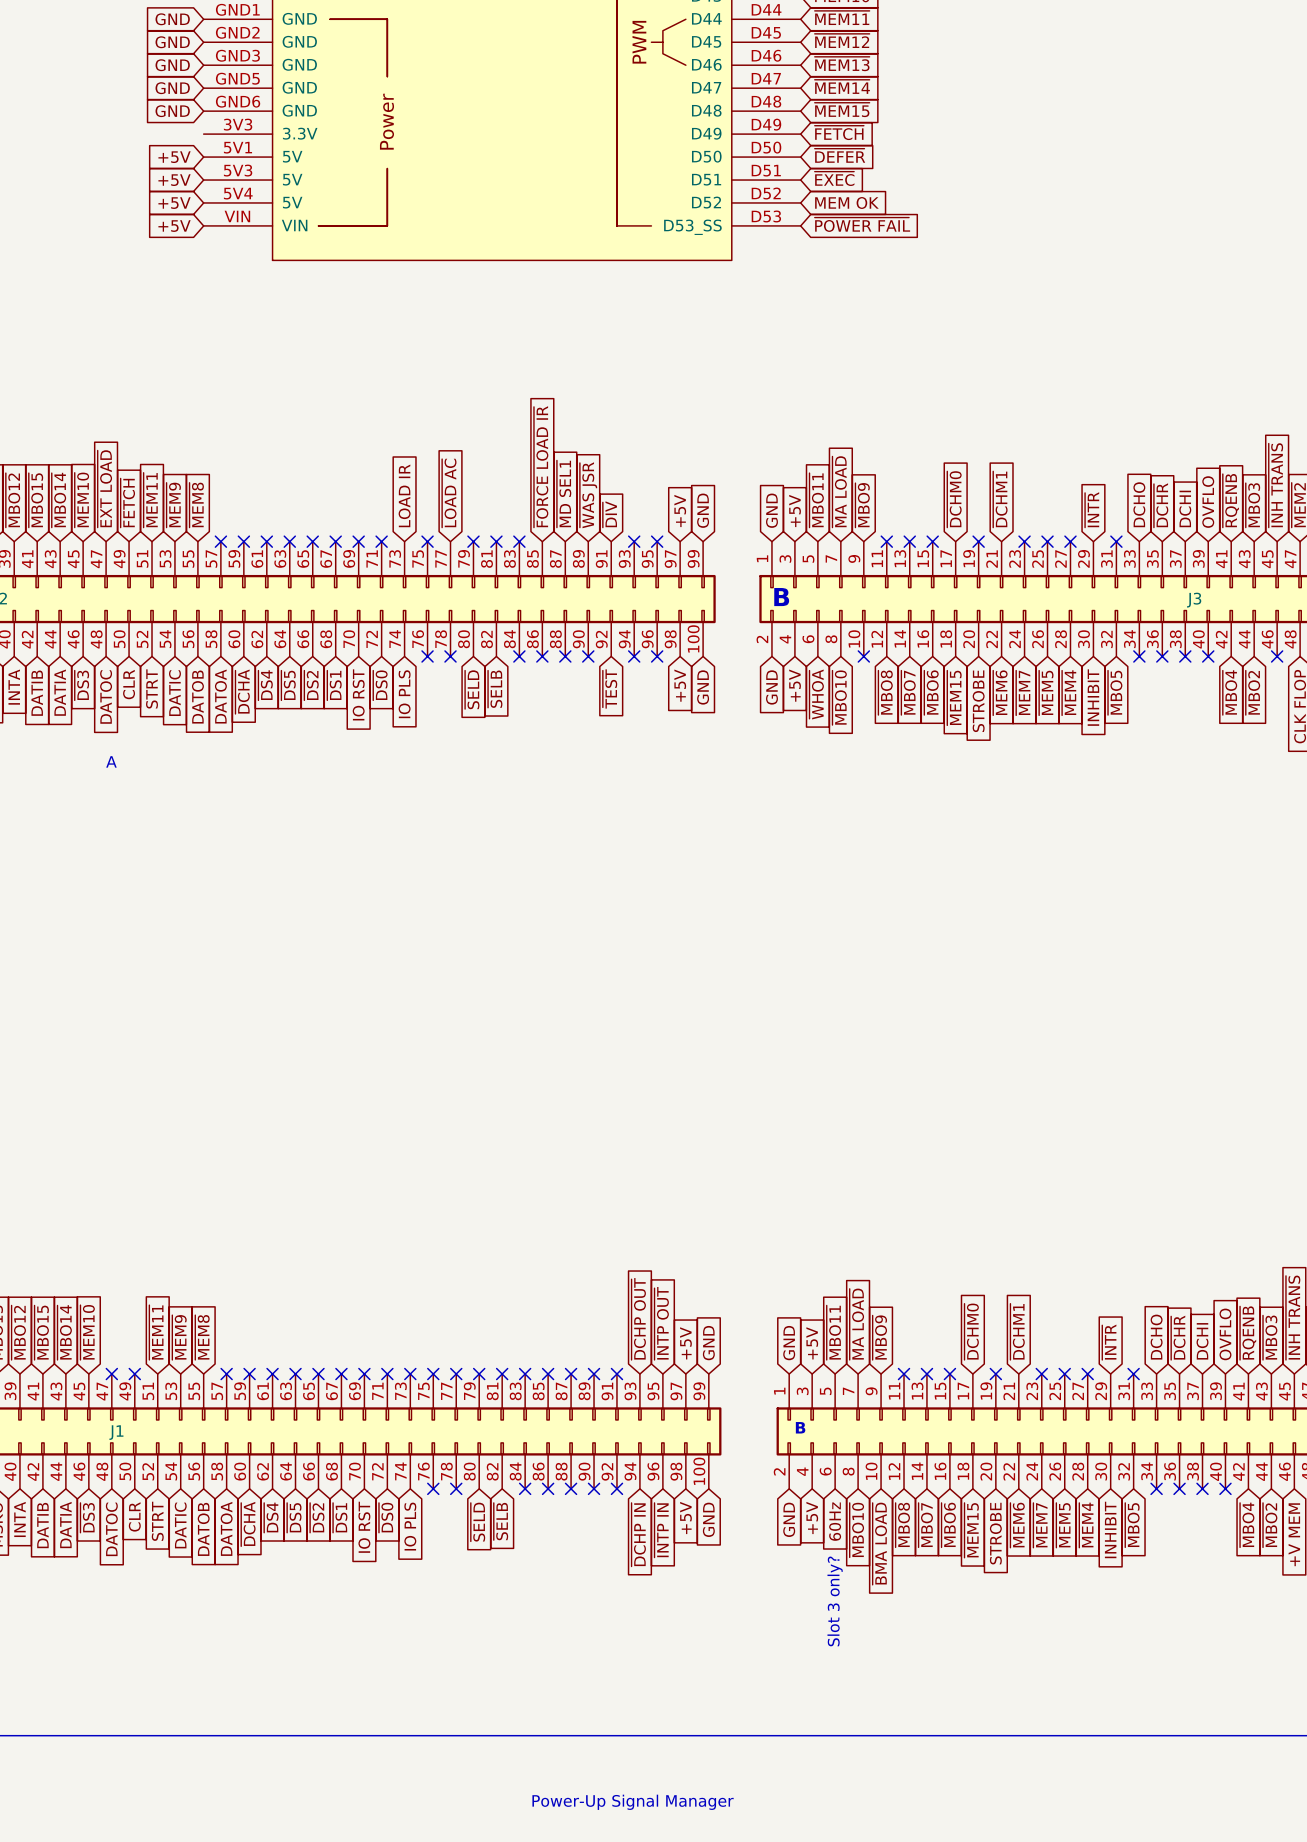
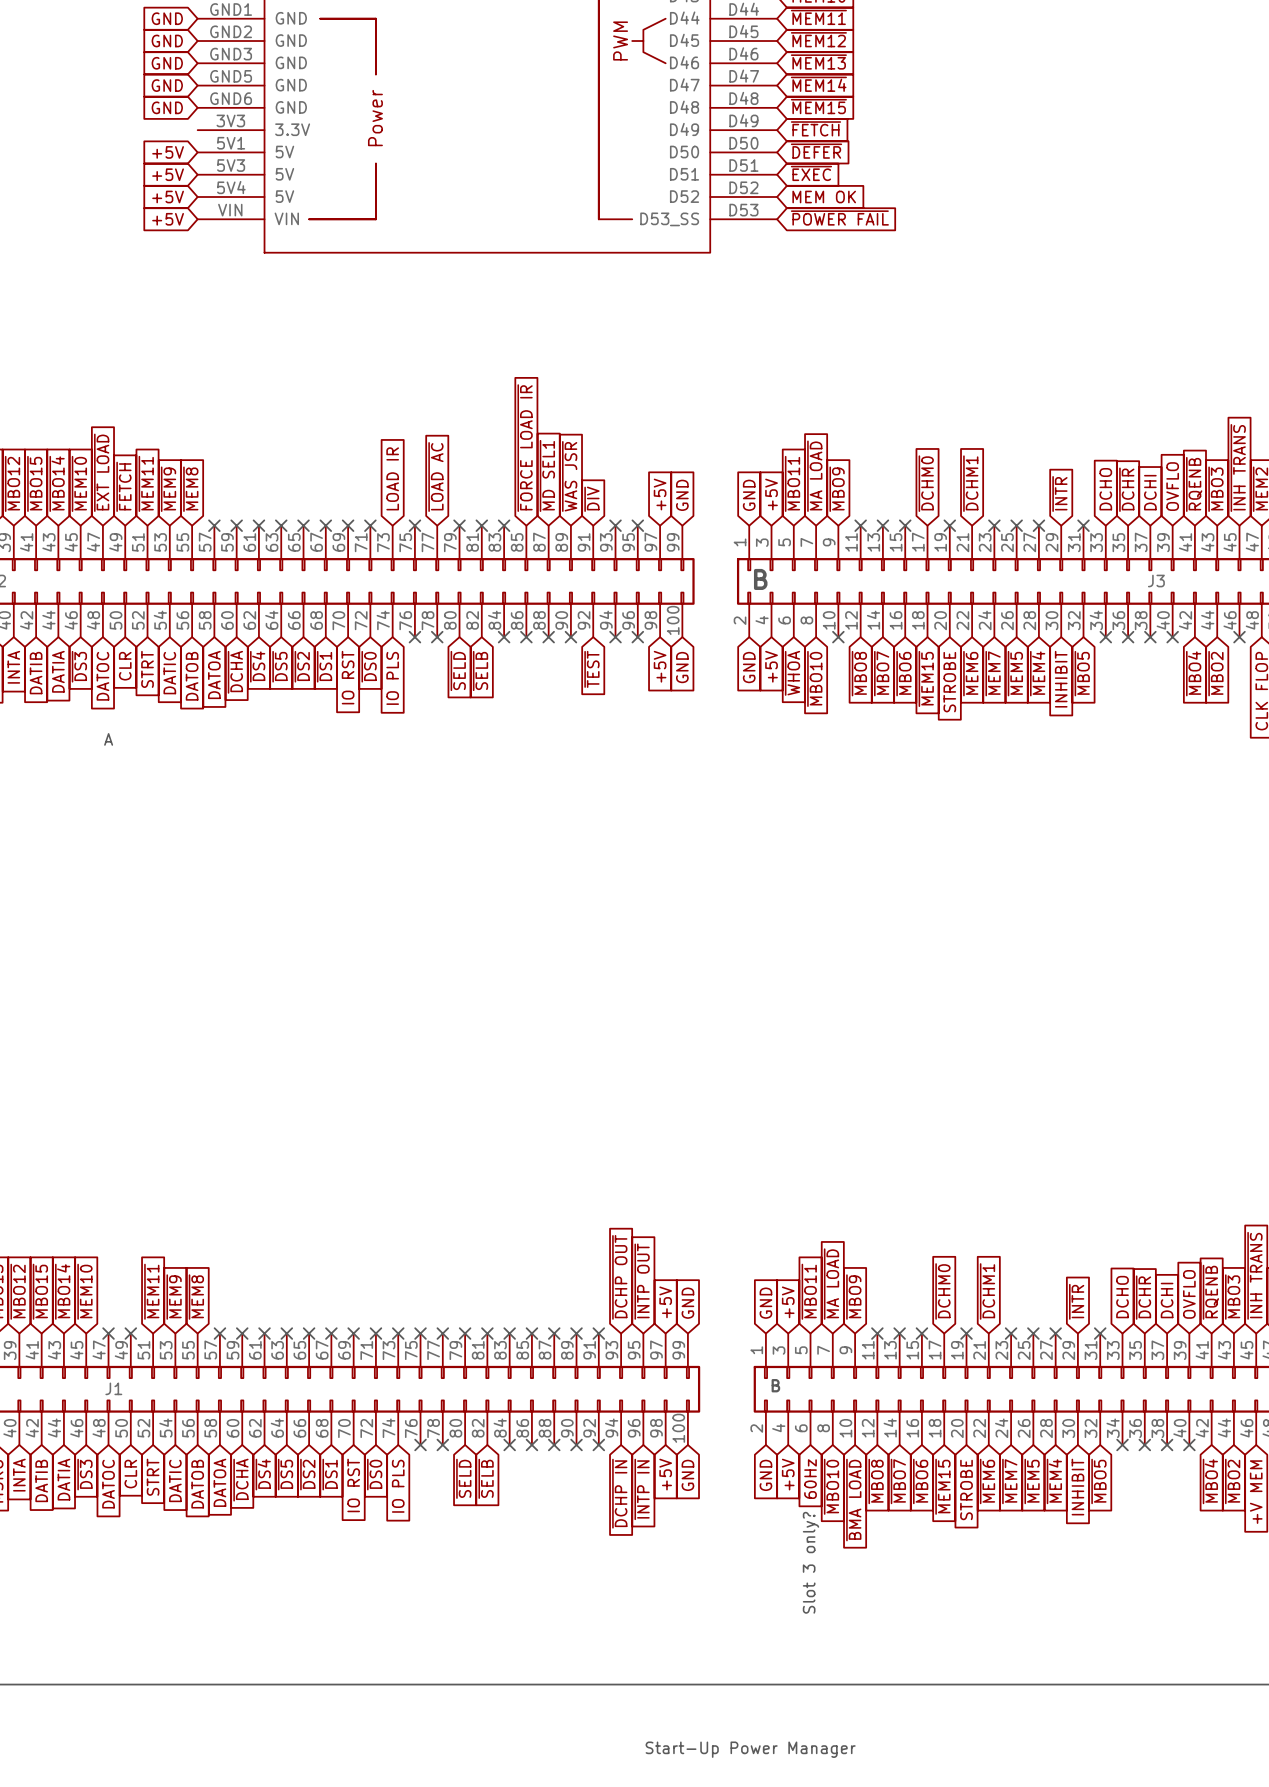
text: Power-Up Signal Manager (633, 1802) -> none
text: none -> Start-Up Power Manager (750, 1749)

